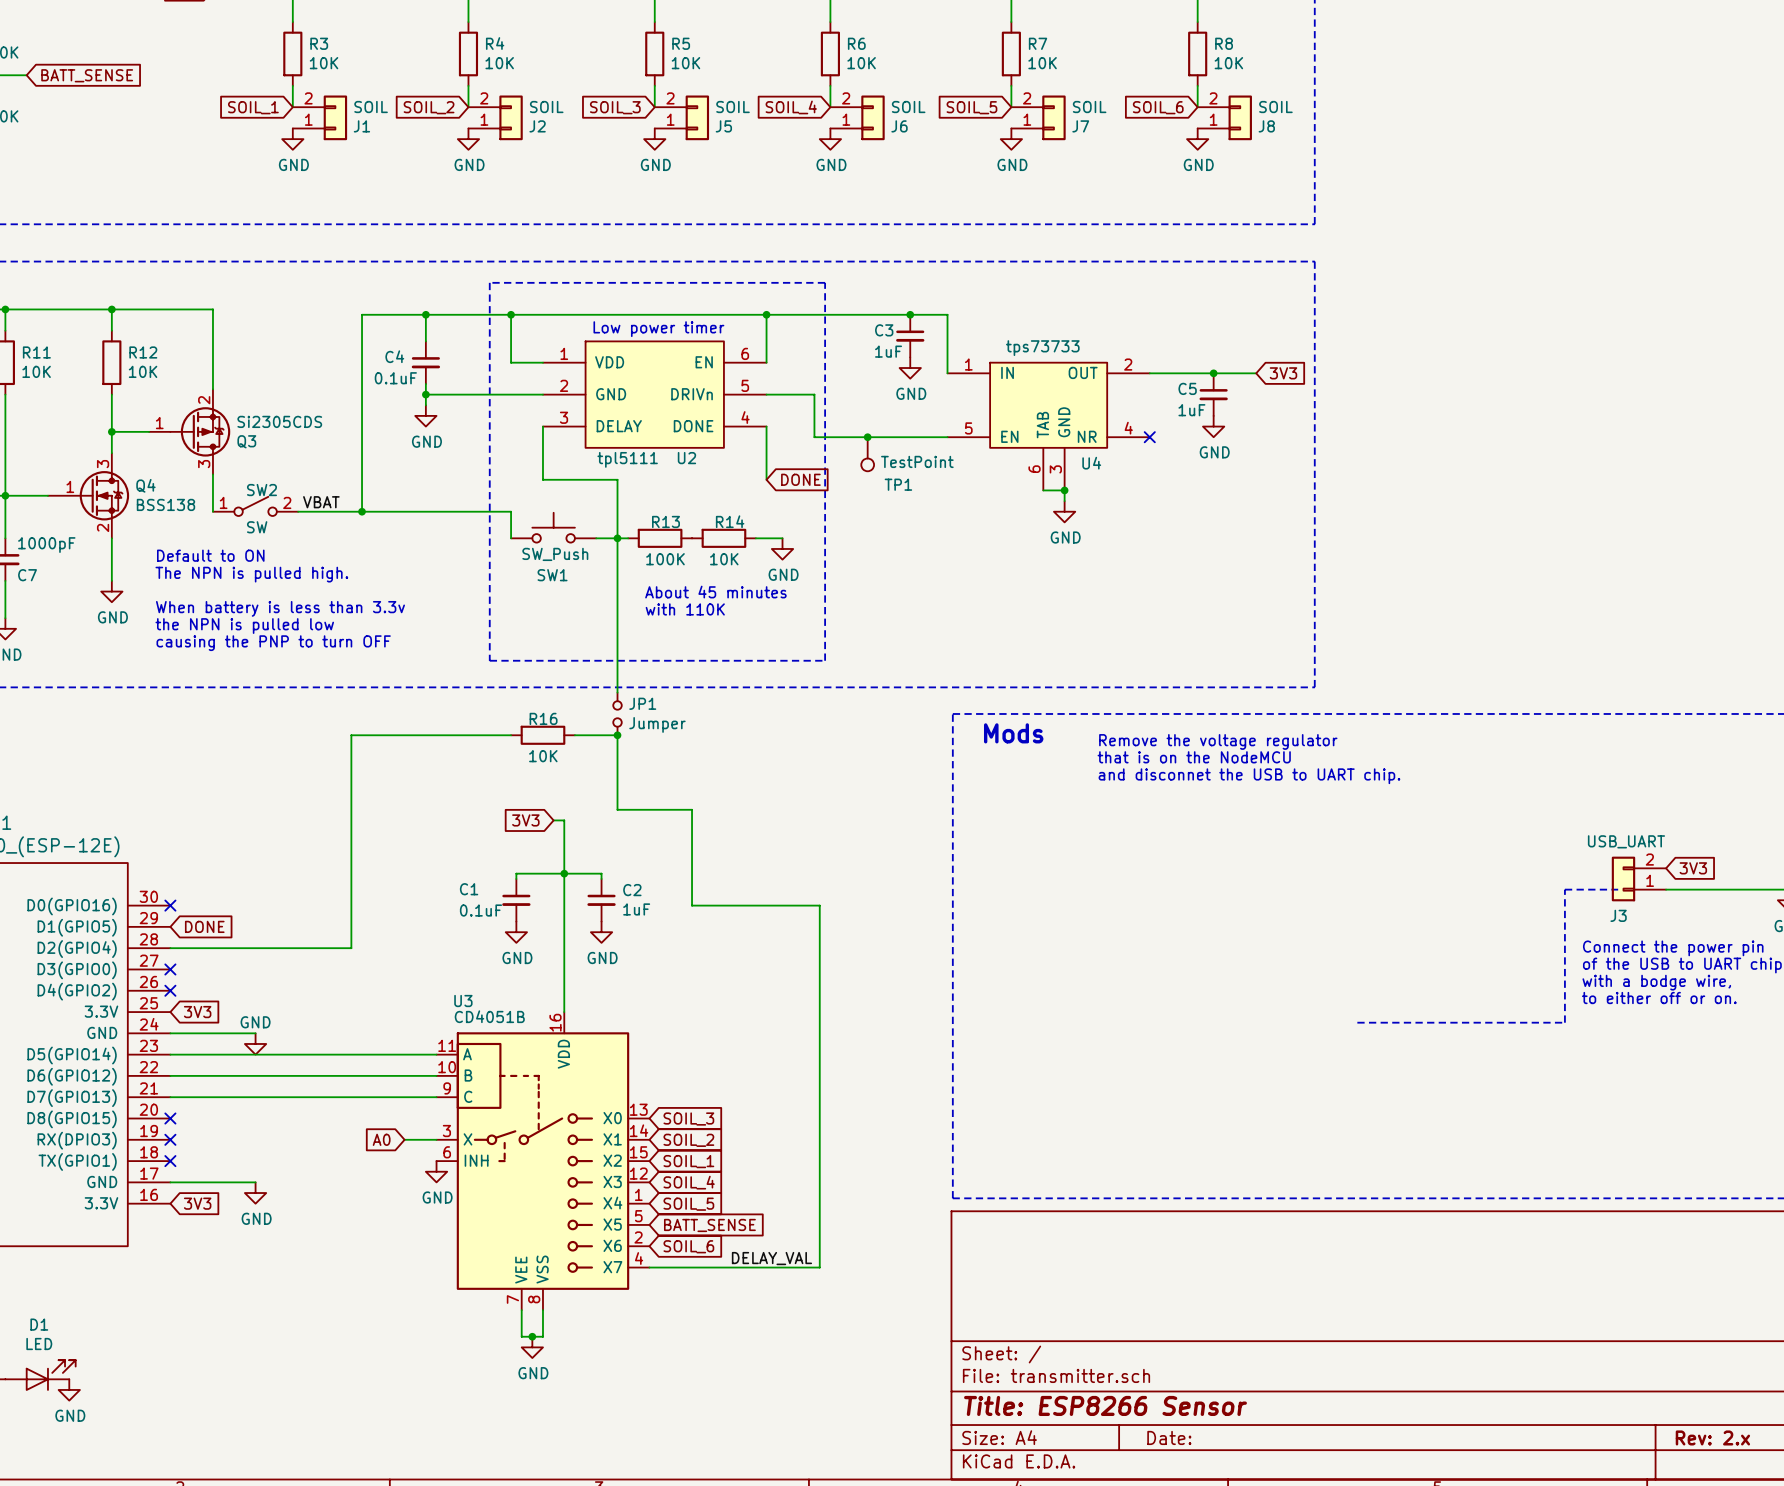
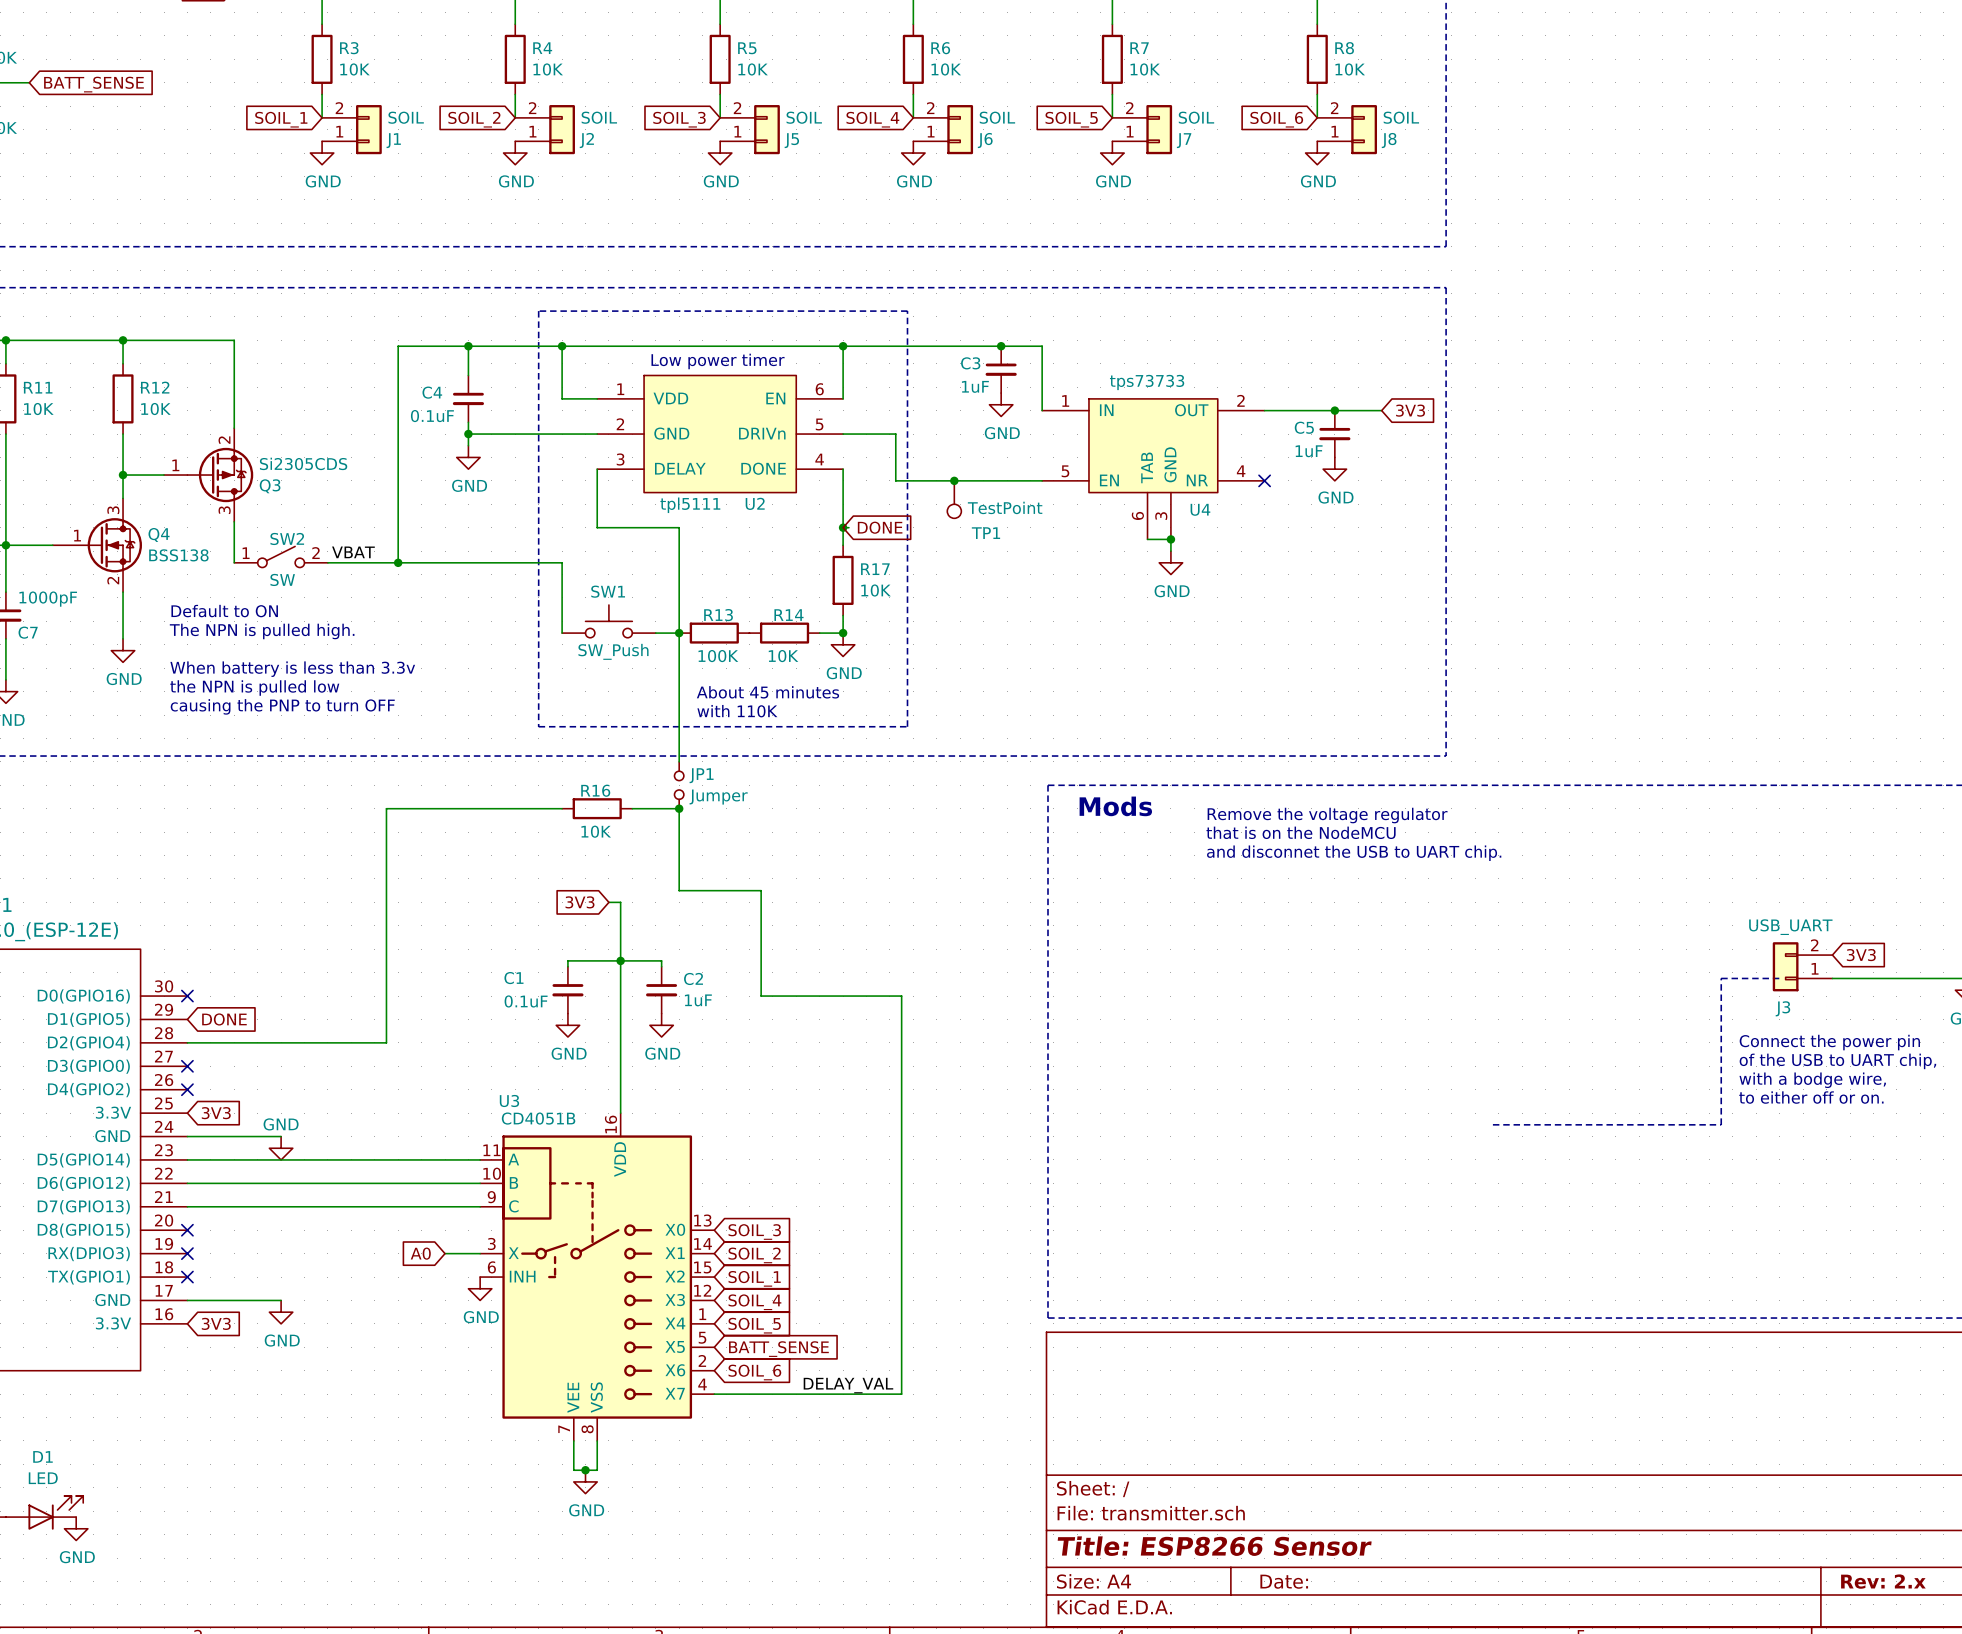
junction: none -> (843, 527)
wire: none -> (848, 527) (843, 527) (843, 545)
SW1 position: (553, 527) -> (608, 621)
R17: none -> 10K (843, 580)
wire: none -> (562, 592) (562, 633)
wire: (596, 538) (628, 538) -> none
junction position: (617, 538) -> (679, 633)
R13 position: (660, 538) -> (714, 633)
R14 position: (723, 538) -> (784, 633)
wire: (755, 538) (782, 538) -> none
power symbol position: GND (782, 548) -> GND (843, 644)
wire: none -> (843, 615) (843, 633) (819, 633)
SW1 name position: SW1 (552, 575) -> SW1 (608, 591)
wire: none -> (655, 633) (679, 633)
junction: none -> (843, 633)
text position: About 45 minutes (715, 592) -> About 45 minutes (767, 692)
text position: with 110K (685, 609) -> with 110K (737, 711)

